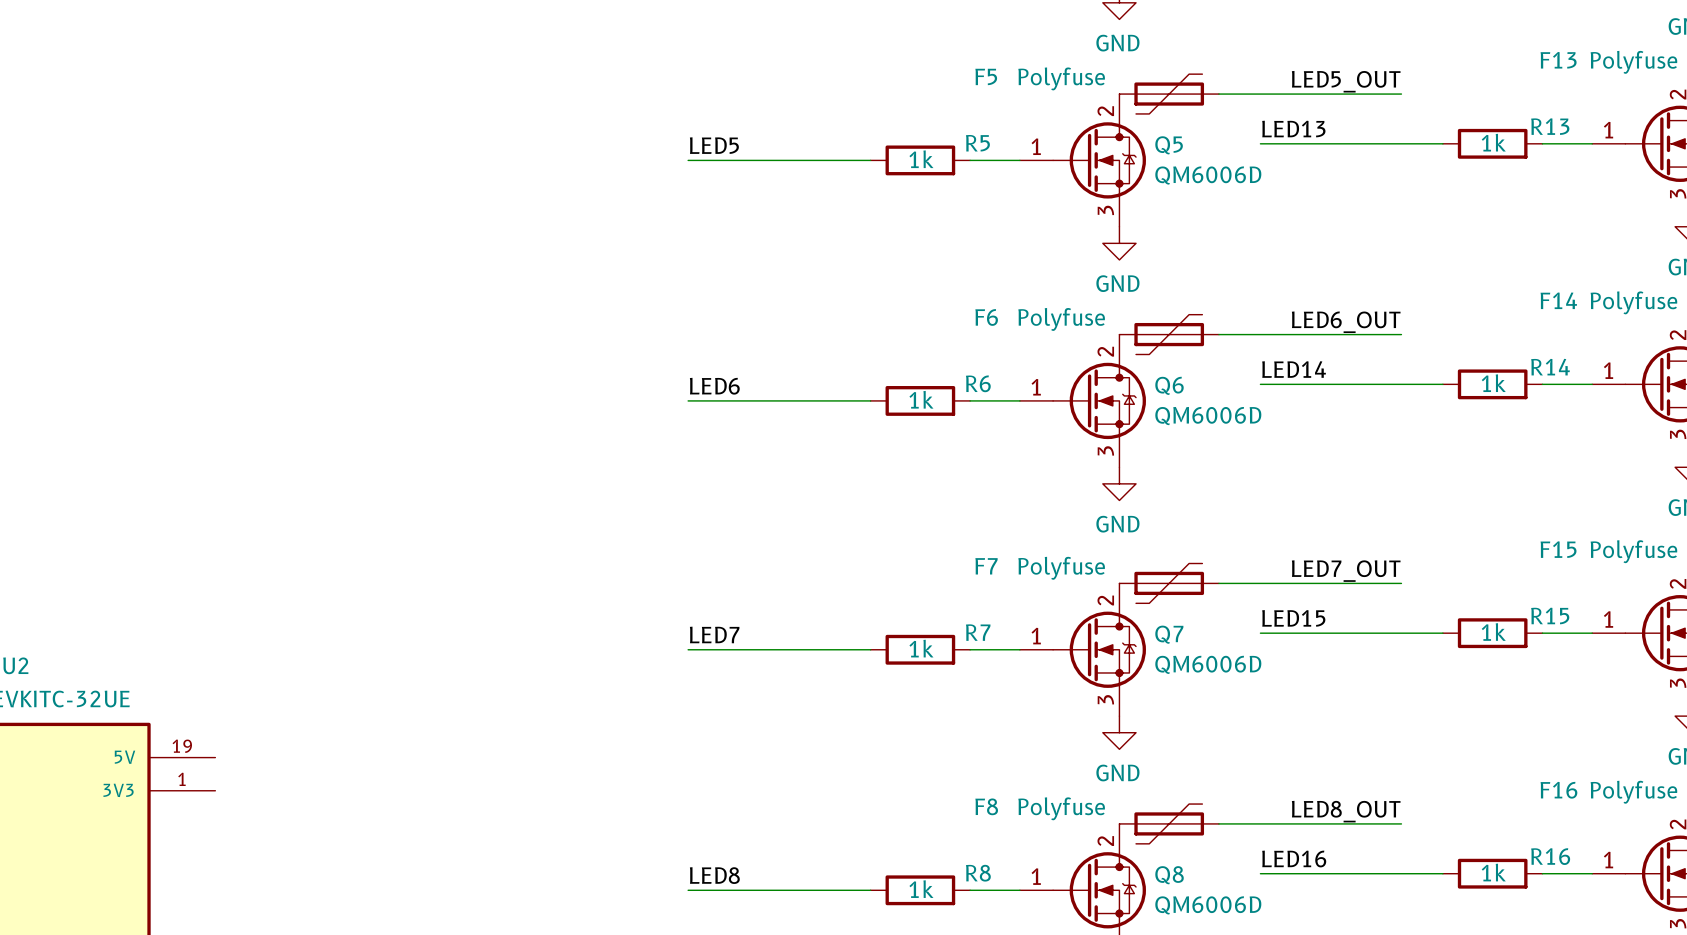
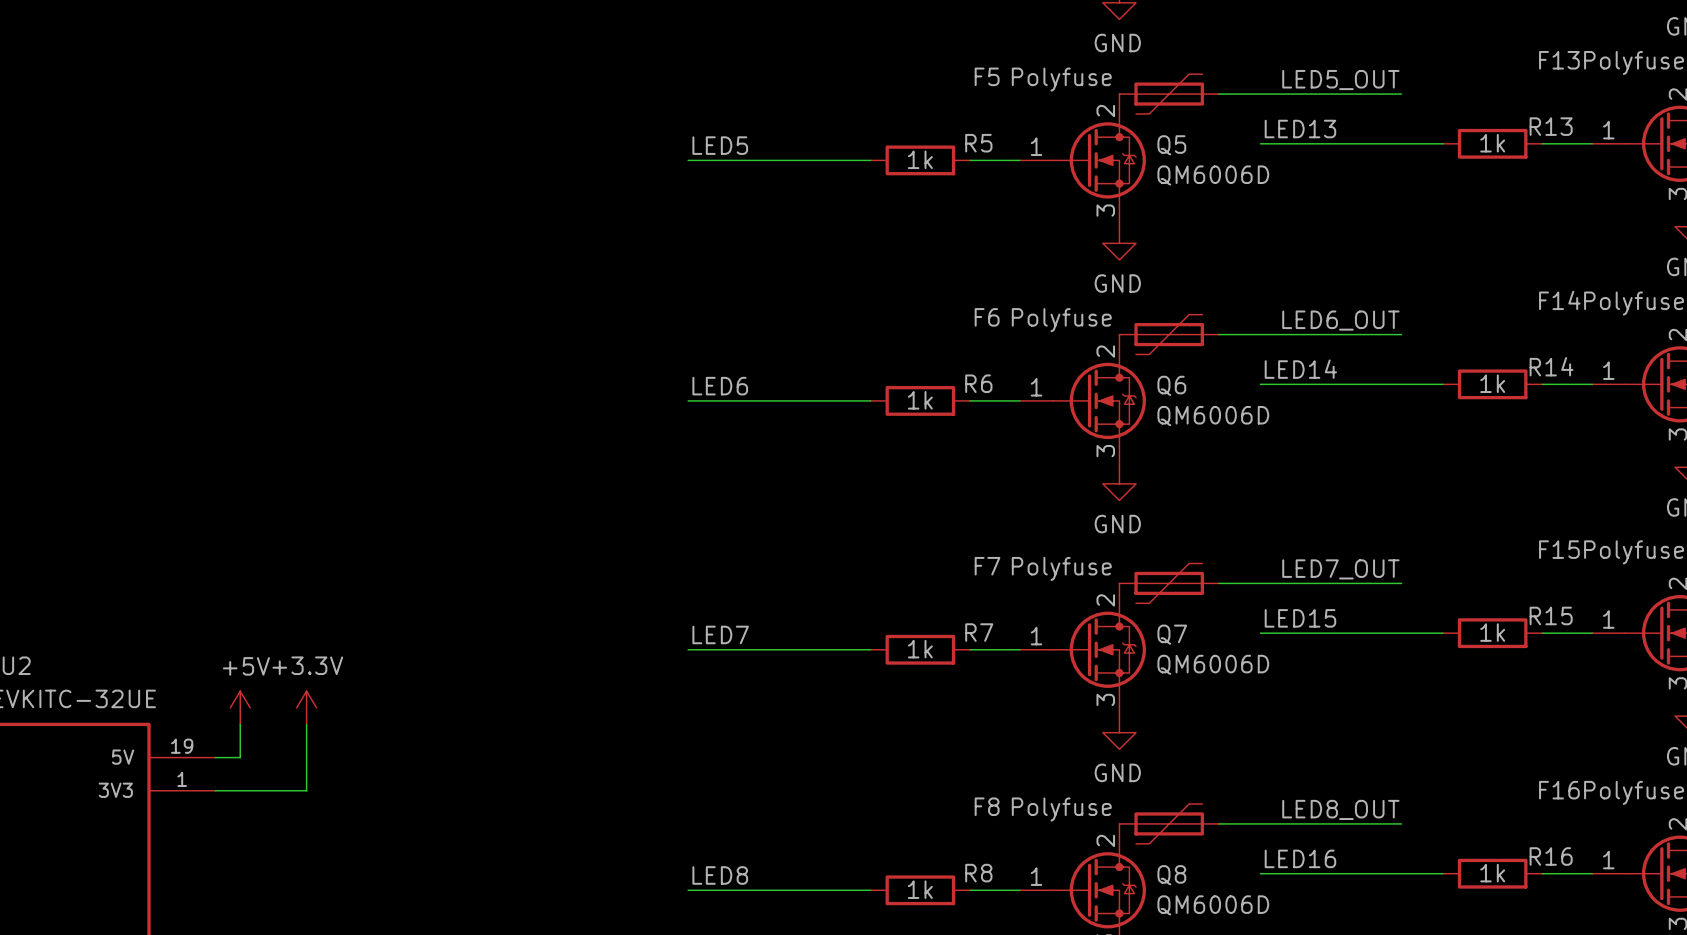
power symbol: none -> +5V (240, 707)
power symbol: none -> +3.3V (306, 707)
wire: none -> (240, 724) (240, 757) (215, 757)
wire: none -> (306, 724) (306, 790) (215, 790)

